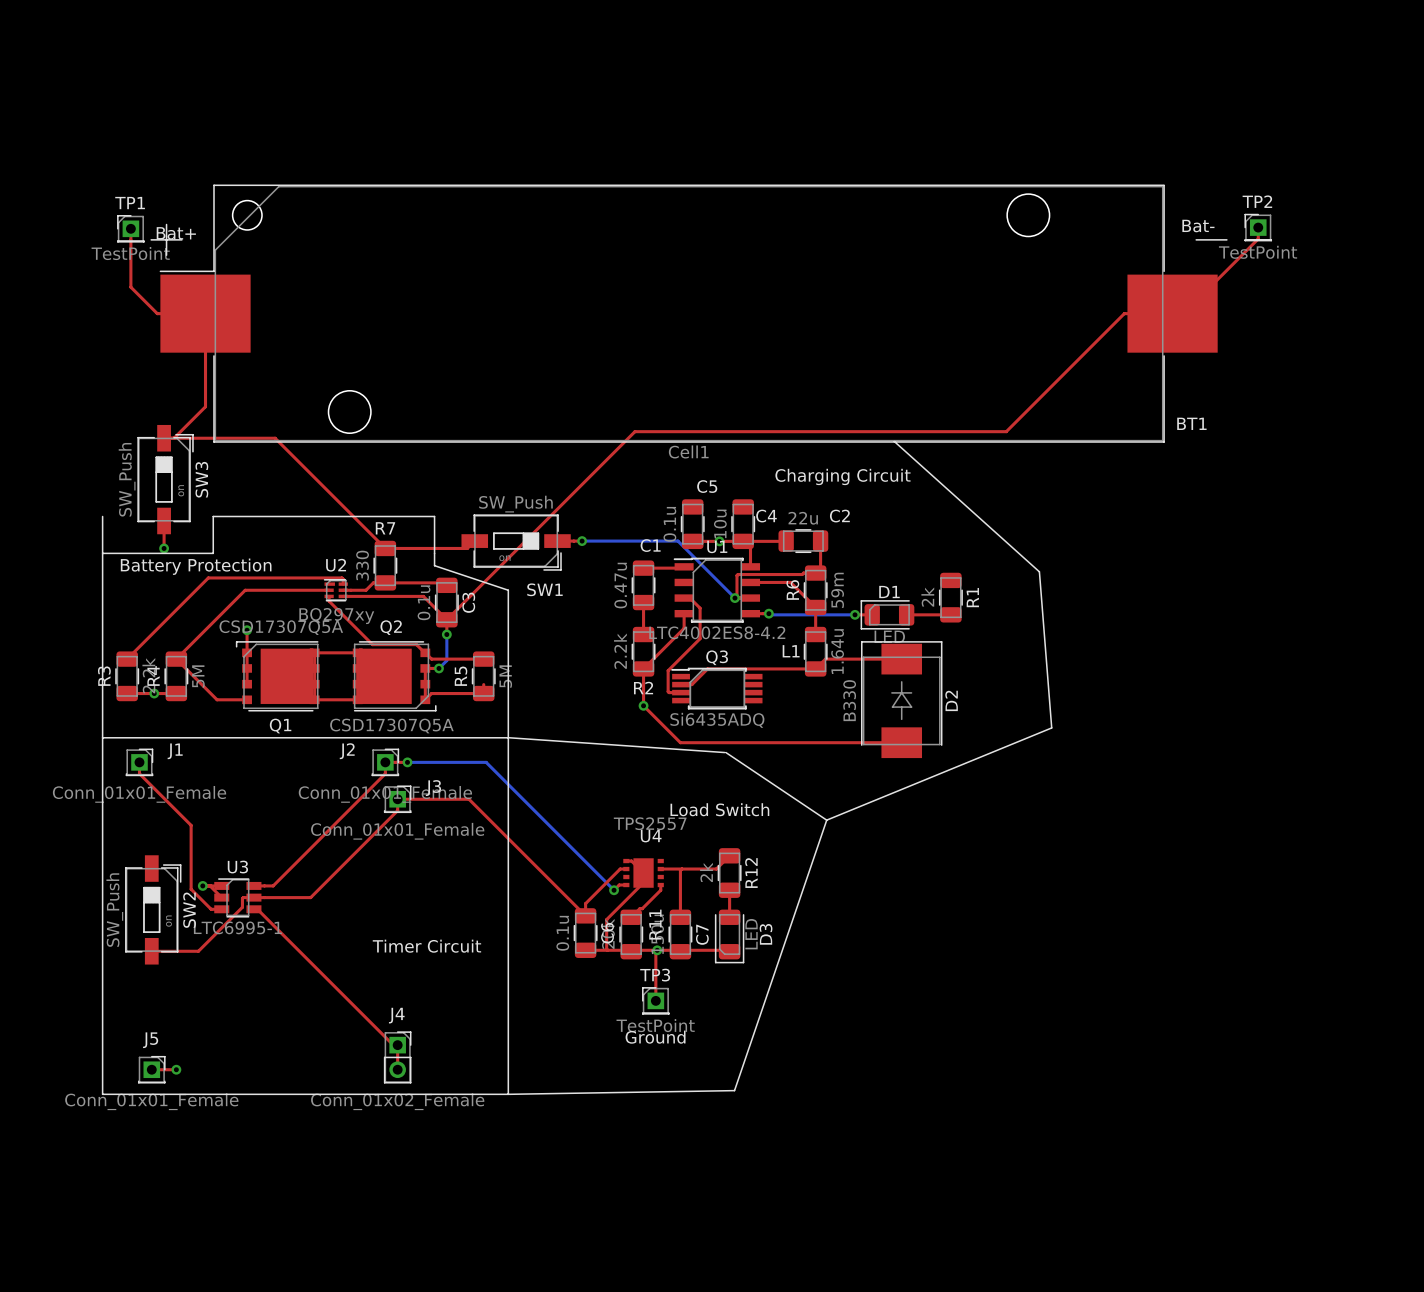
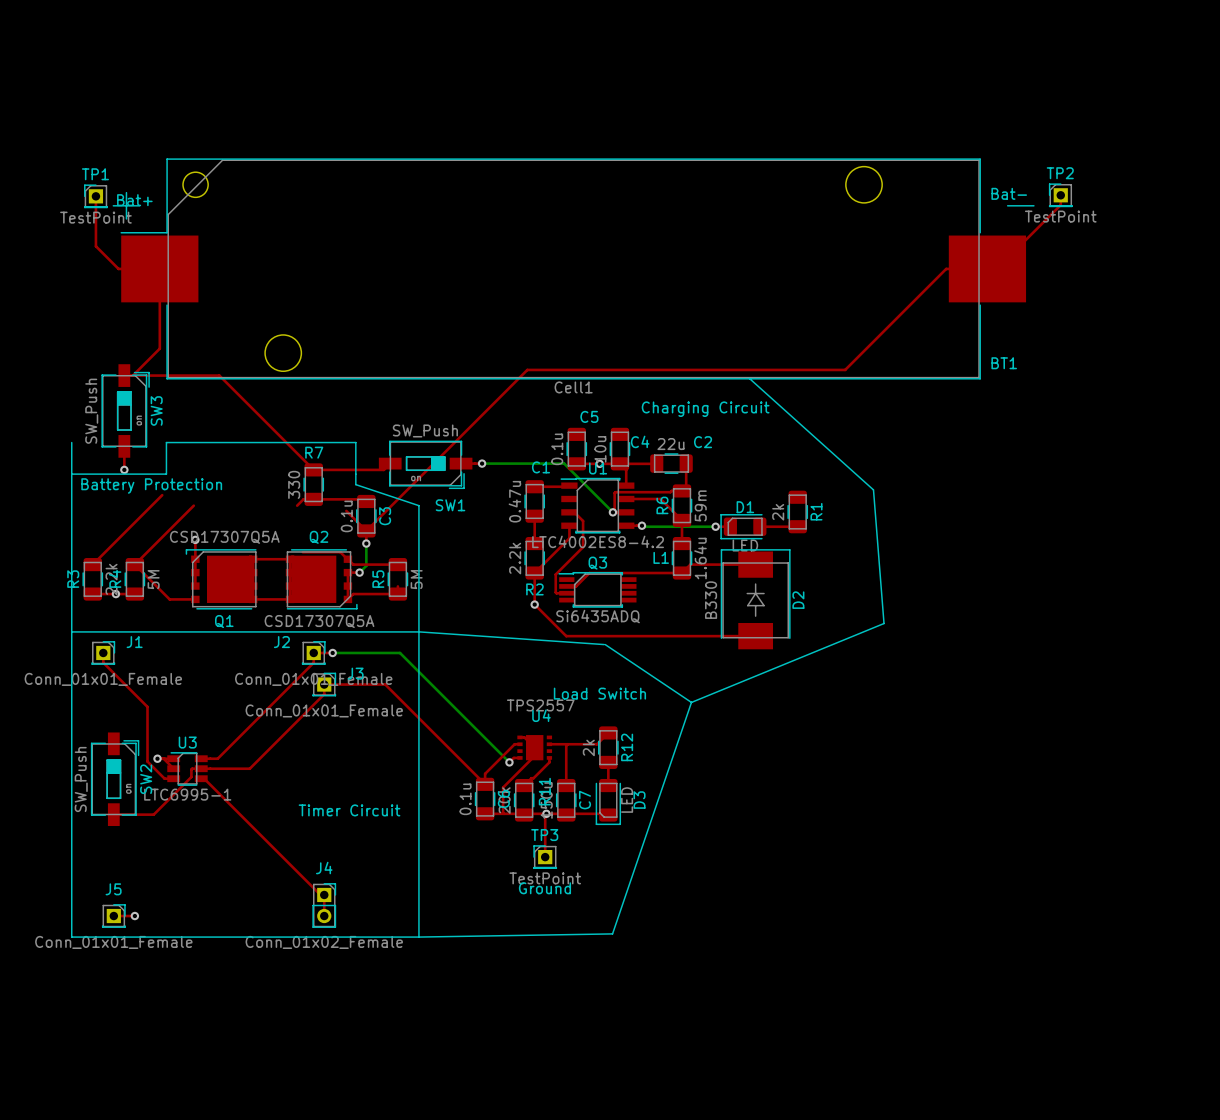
top track: (208, 577) (341, 577) (343, 584) -> none
top track: (245, 590) (329, 590) -> none
U2: BQ297xy (335, 590) -> none
top track: (343, 590) (366, 590) -> none
top track: (329, 596) (329, 601) (372, 644) -> none
top track: (343, 596) (423, 596) -> none

